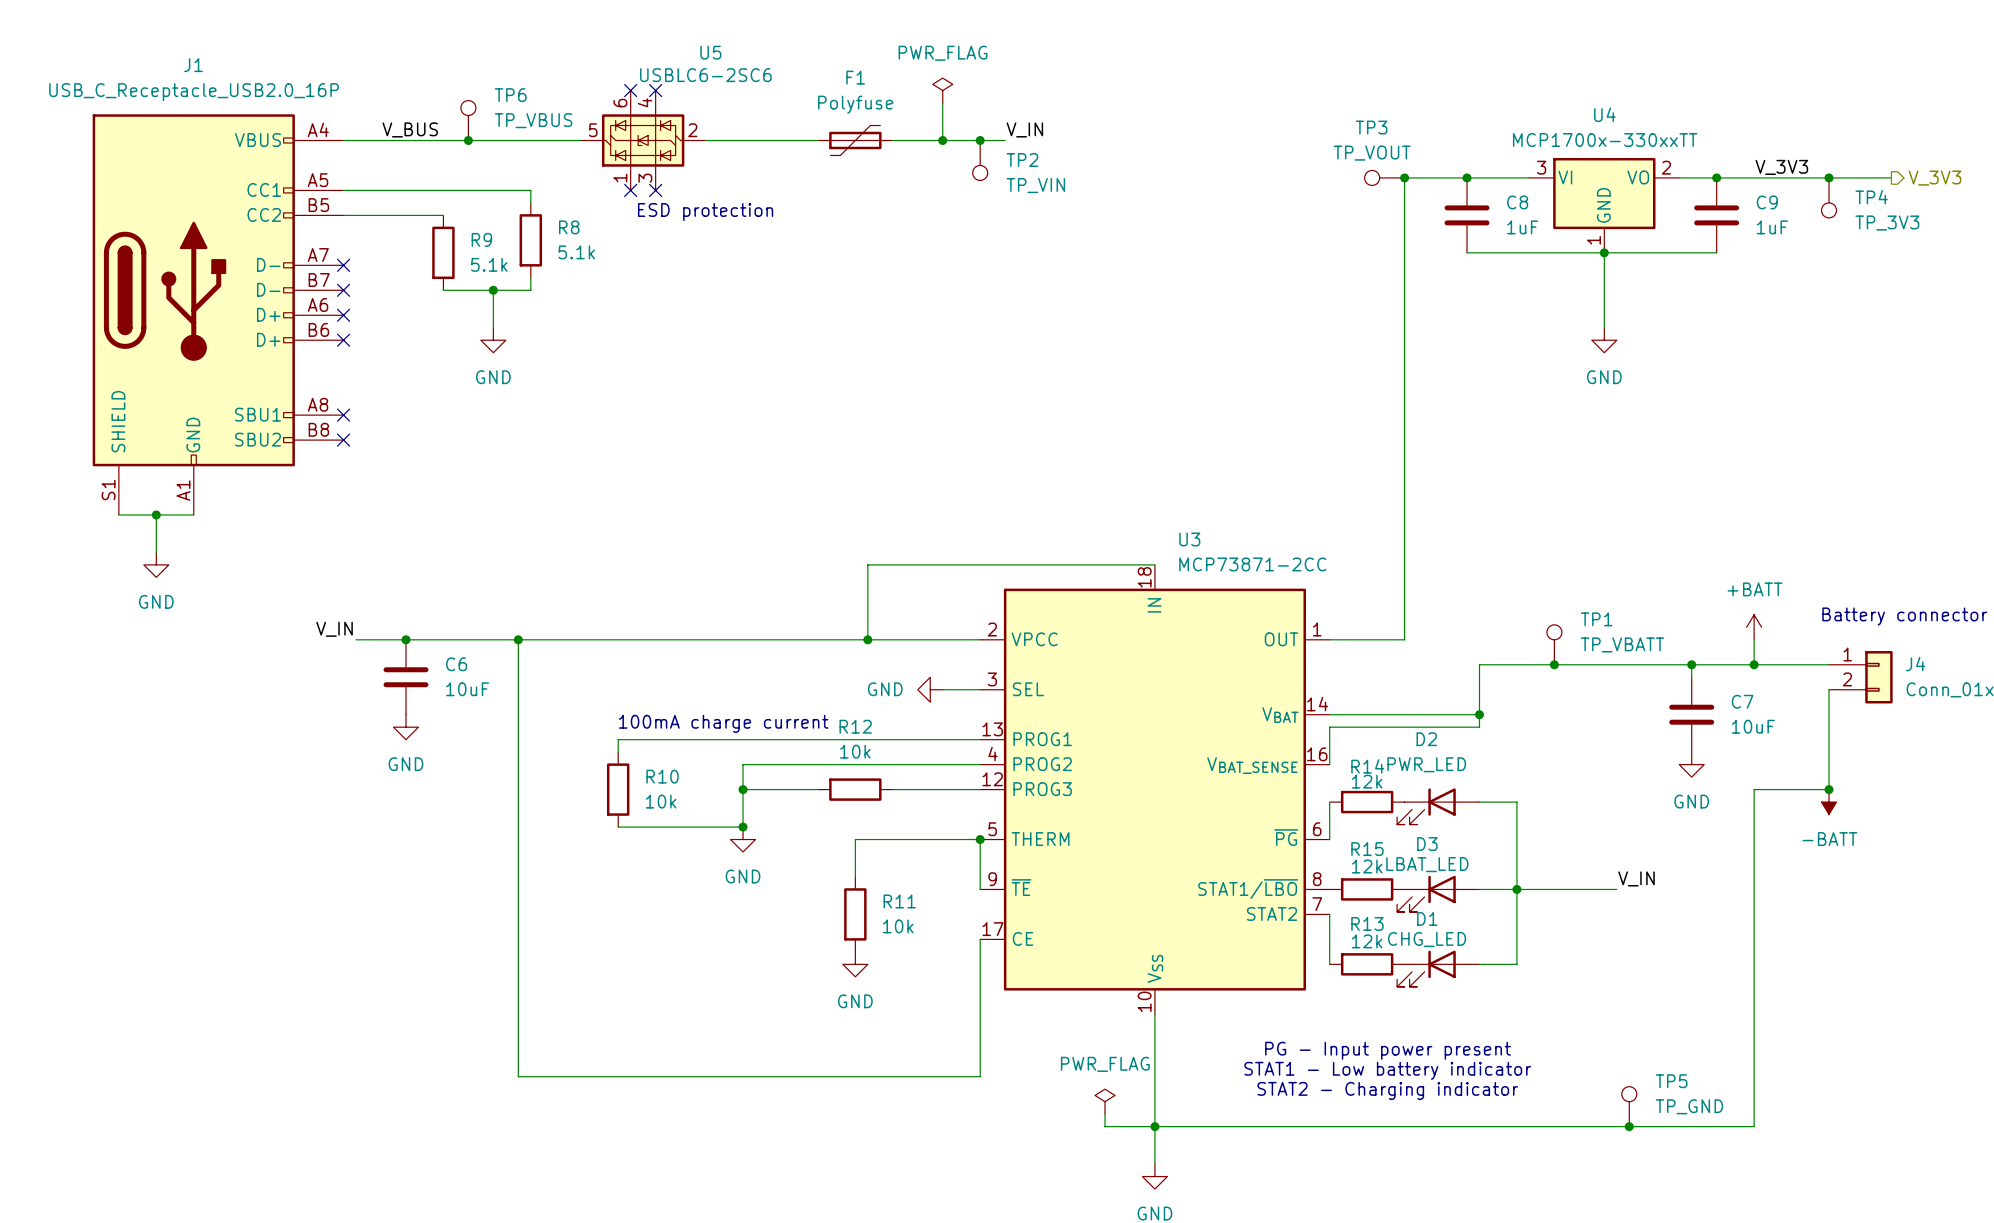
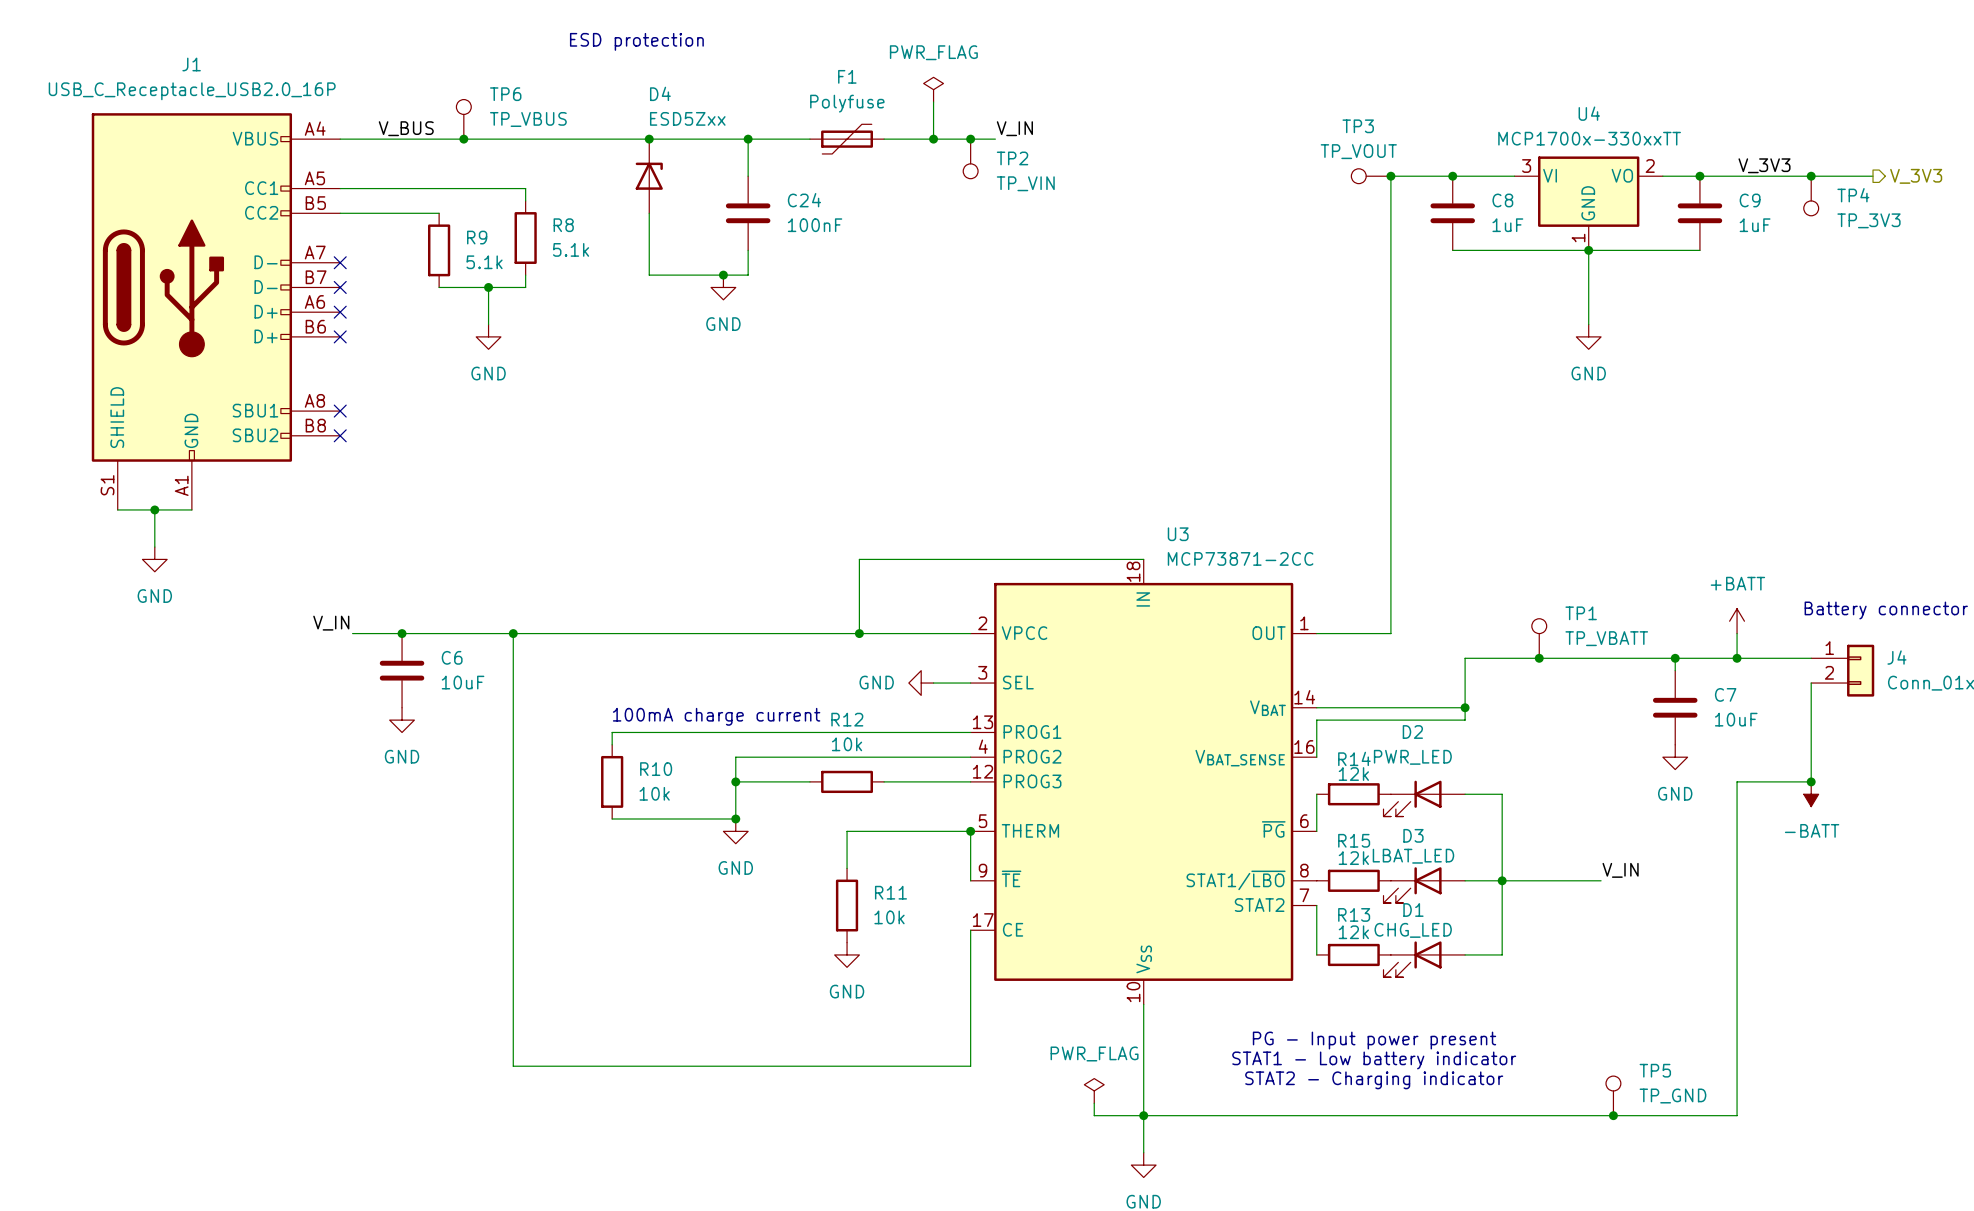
no-connect mark: (630, 90) -> none
no-connect mark: (655, 90) -> none
U5: USBLC6-2SC6 (643, 140) -> none
junction: none -> (649, 139)
wire: none -> (748, 139) (748, 176)
junction: none -> (748, 139)
D4: none -> ESD5Zxx (649, 176)
no-connect mark: (630, 190) -> none
no-connect mark: (655, 190) -> none
text position: ESD protection (705, 212) -> ESD protection (636, 41)
wire: none -> (649, 213) (649, 275) (748, 275) (748, 250)
C24: none -> 100nF (748, 213)
junction: none -> (723, 275)
power symbol: none -> GND (723, 287)

